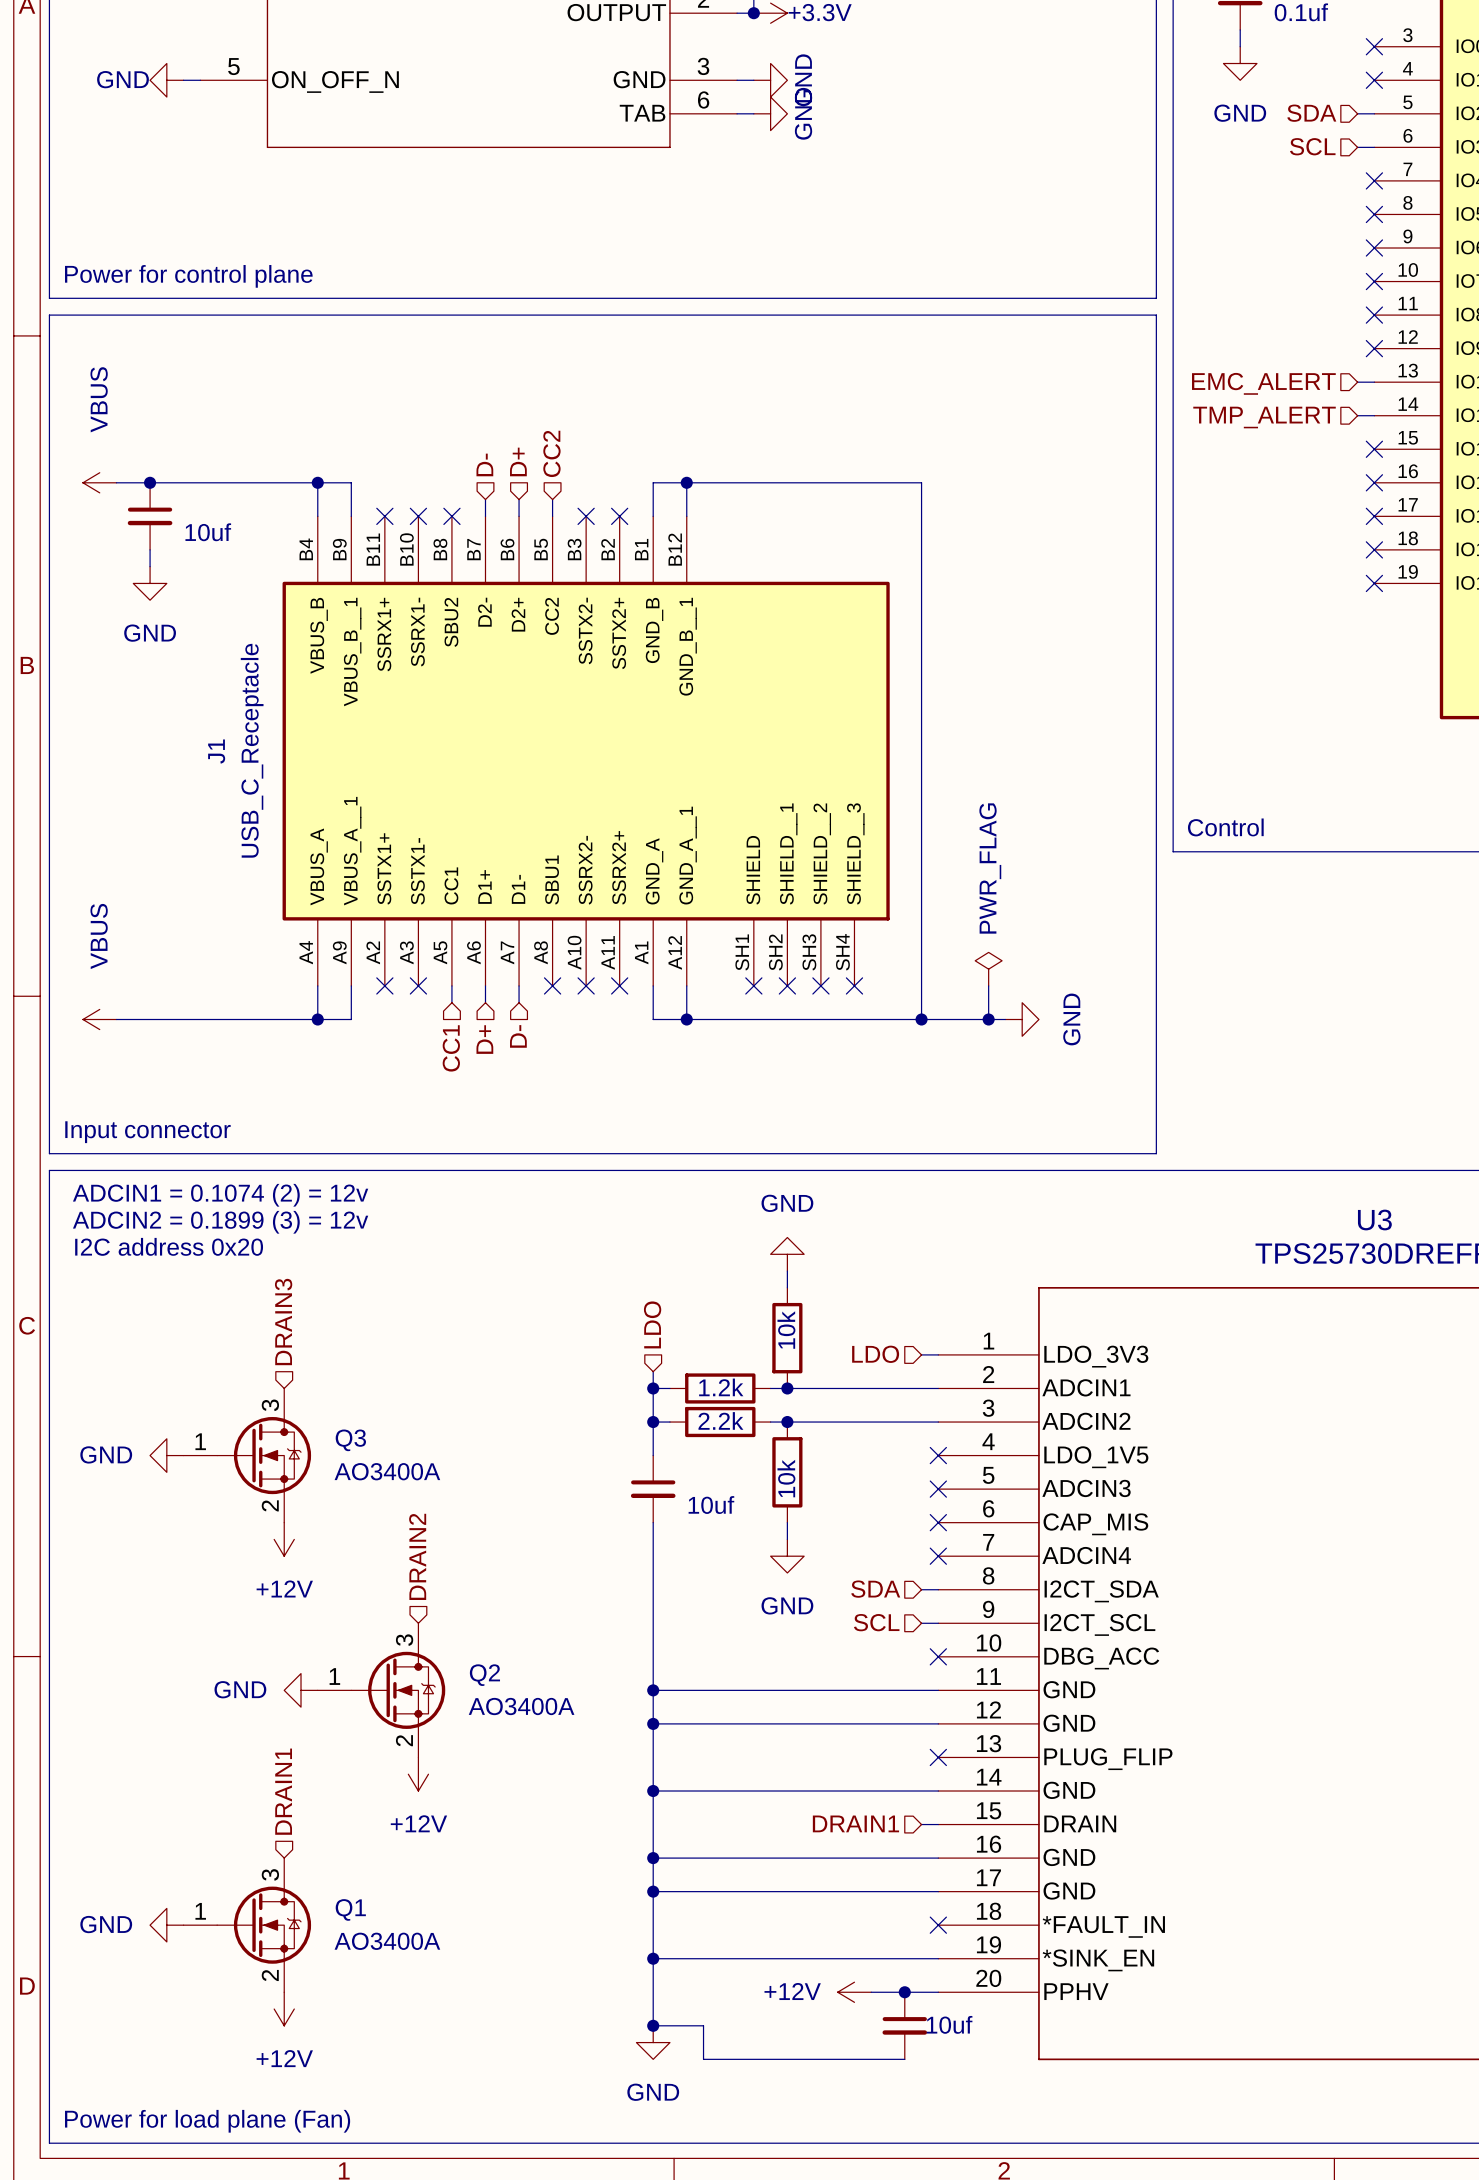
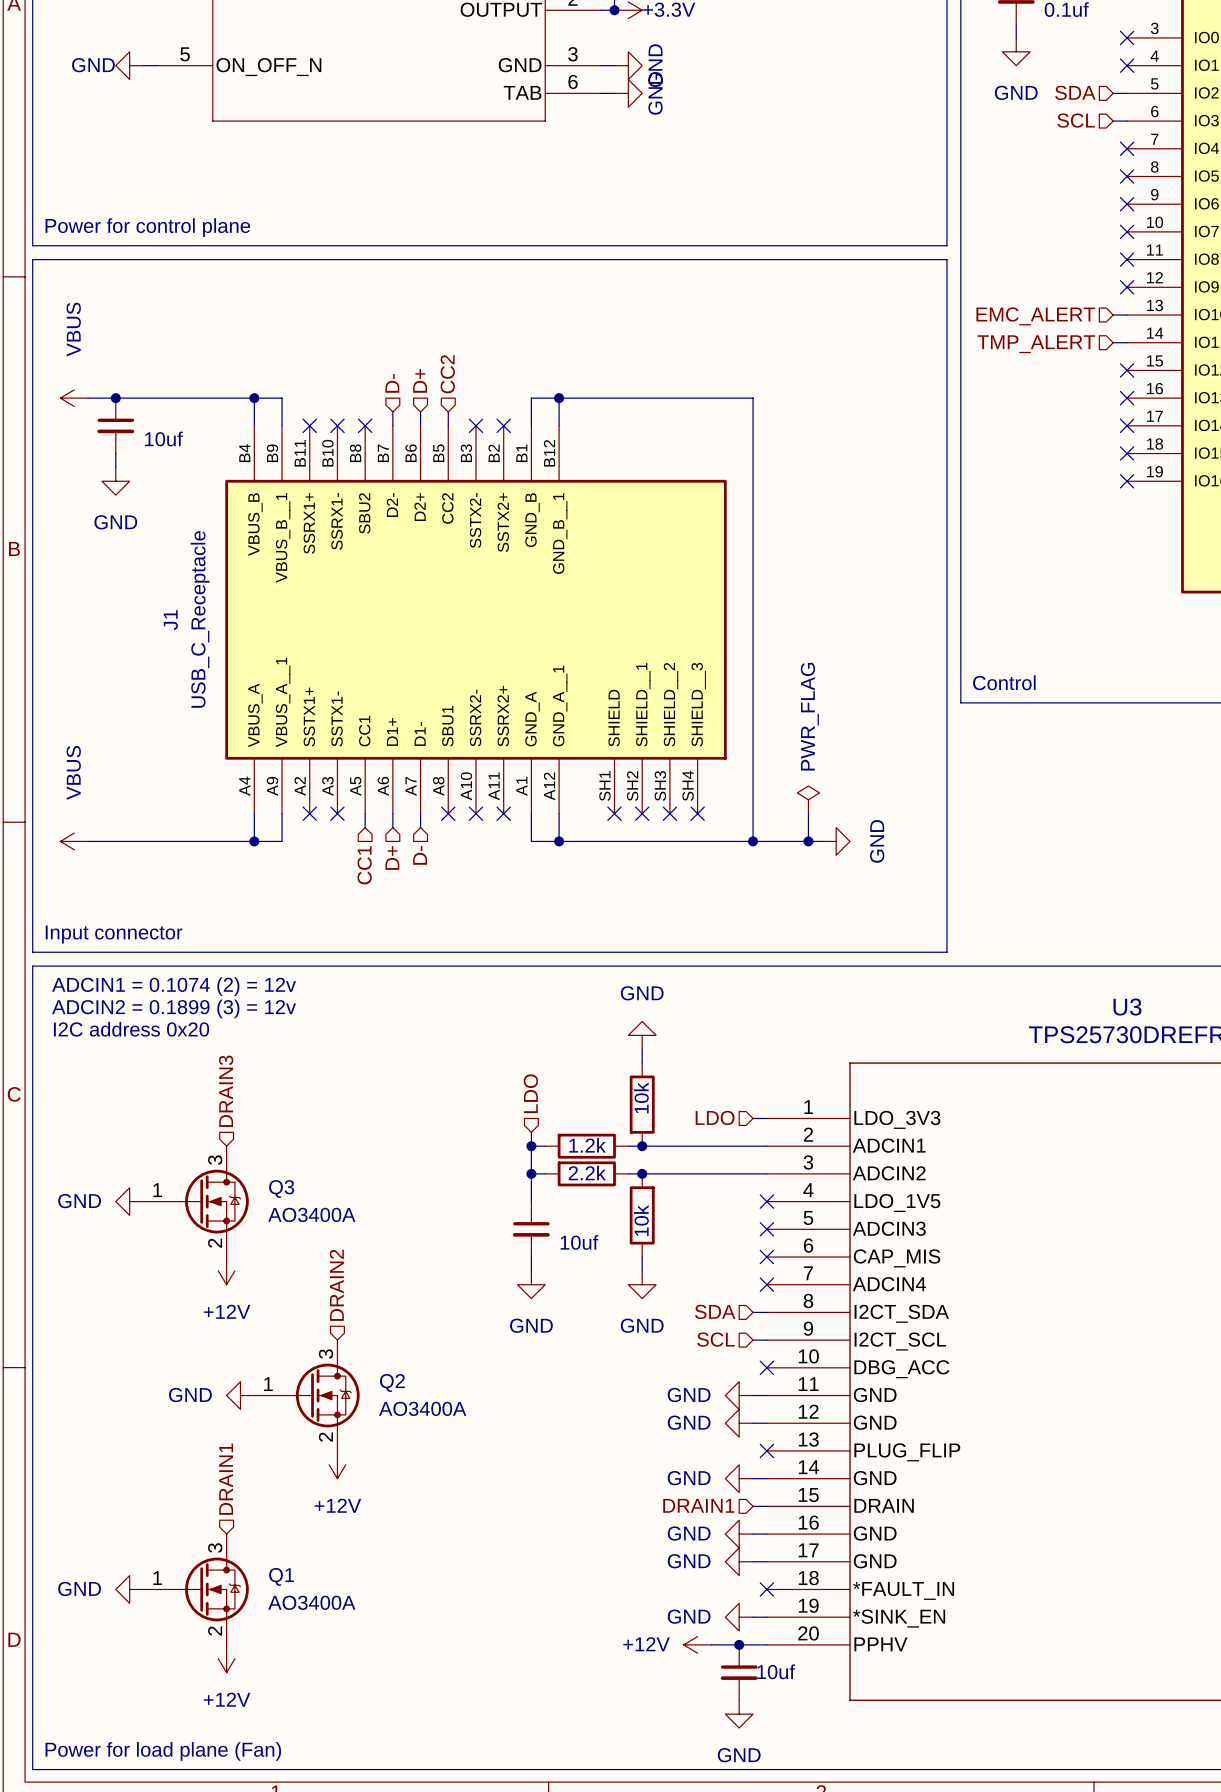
wire: (653, 1539) (653, 2025) (703, 2025) (703, 2059) (904, 2059) -> none
power symbol: none -> GND (531, 1284)
wire: (653, 1690) (921, 1690) -> none
junction: (653, 1690) -> none
power symbol: none -> GND (739, 1395)
wire: (653, 1723) (921, 1723) -> none
junction: (653, 1723) -> none
power symbol: none -> GND (739, 1423)
wire: (653, 1791) (921, 1791) -> none
junction: (653, 1791) -> none
power symbol: none -> GND (739, 1478)
wire: (653, 1858) (921, 1858) -> none
junction: (653, 1858) -> none
power symbol: none -> GND (739, 1534)
wire: (653, 1891) (921, 1891) -> none
junction: (653, 1891) -> none
power symbol: none -> GND (739, 1561)
wire: (653, 1958) (921, 1958) -> none
junction: (653, 1958) -> none
power symbol: none -> GND (739, 1617)
junction: (653, 2025) -> none
power symbol: GND (653, 2042) -> none
power symbol: none -> GND (739, 1714)

